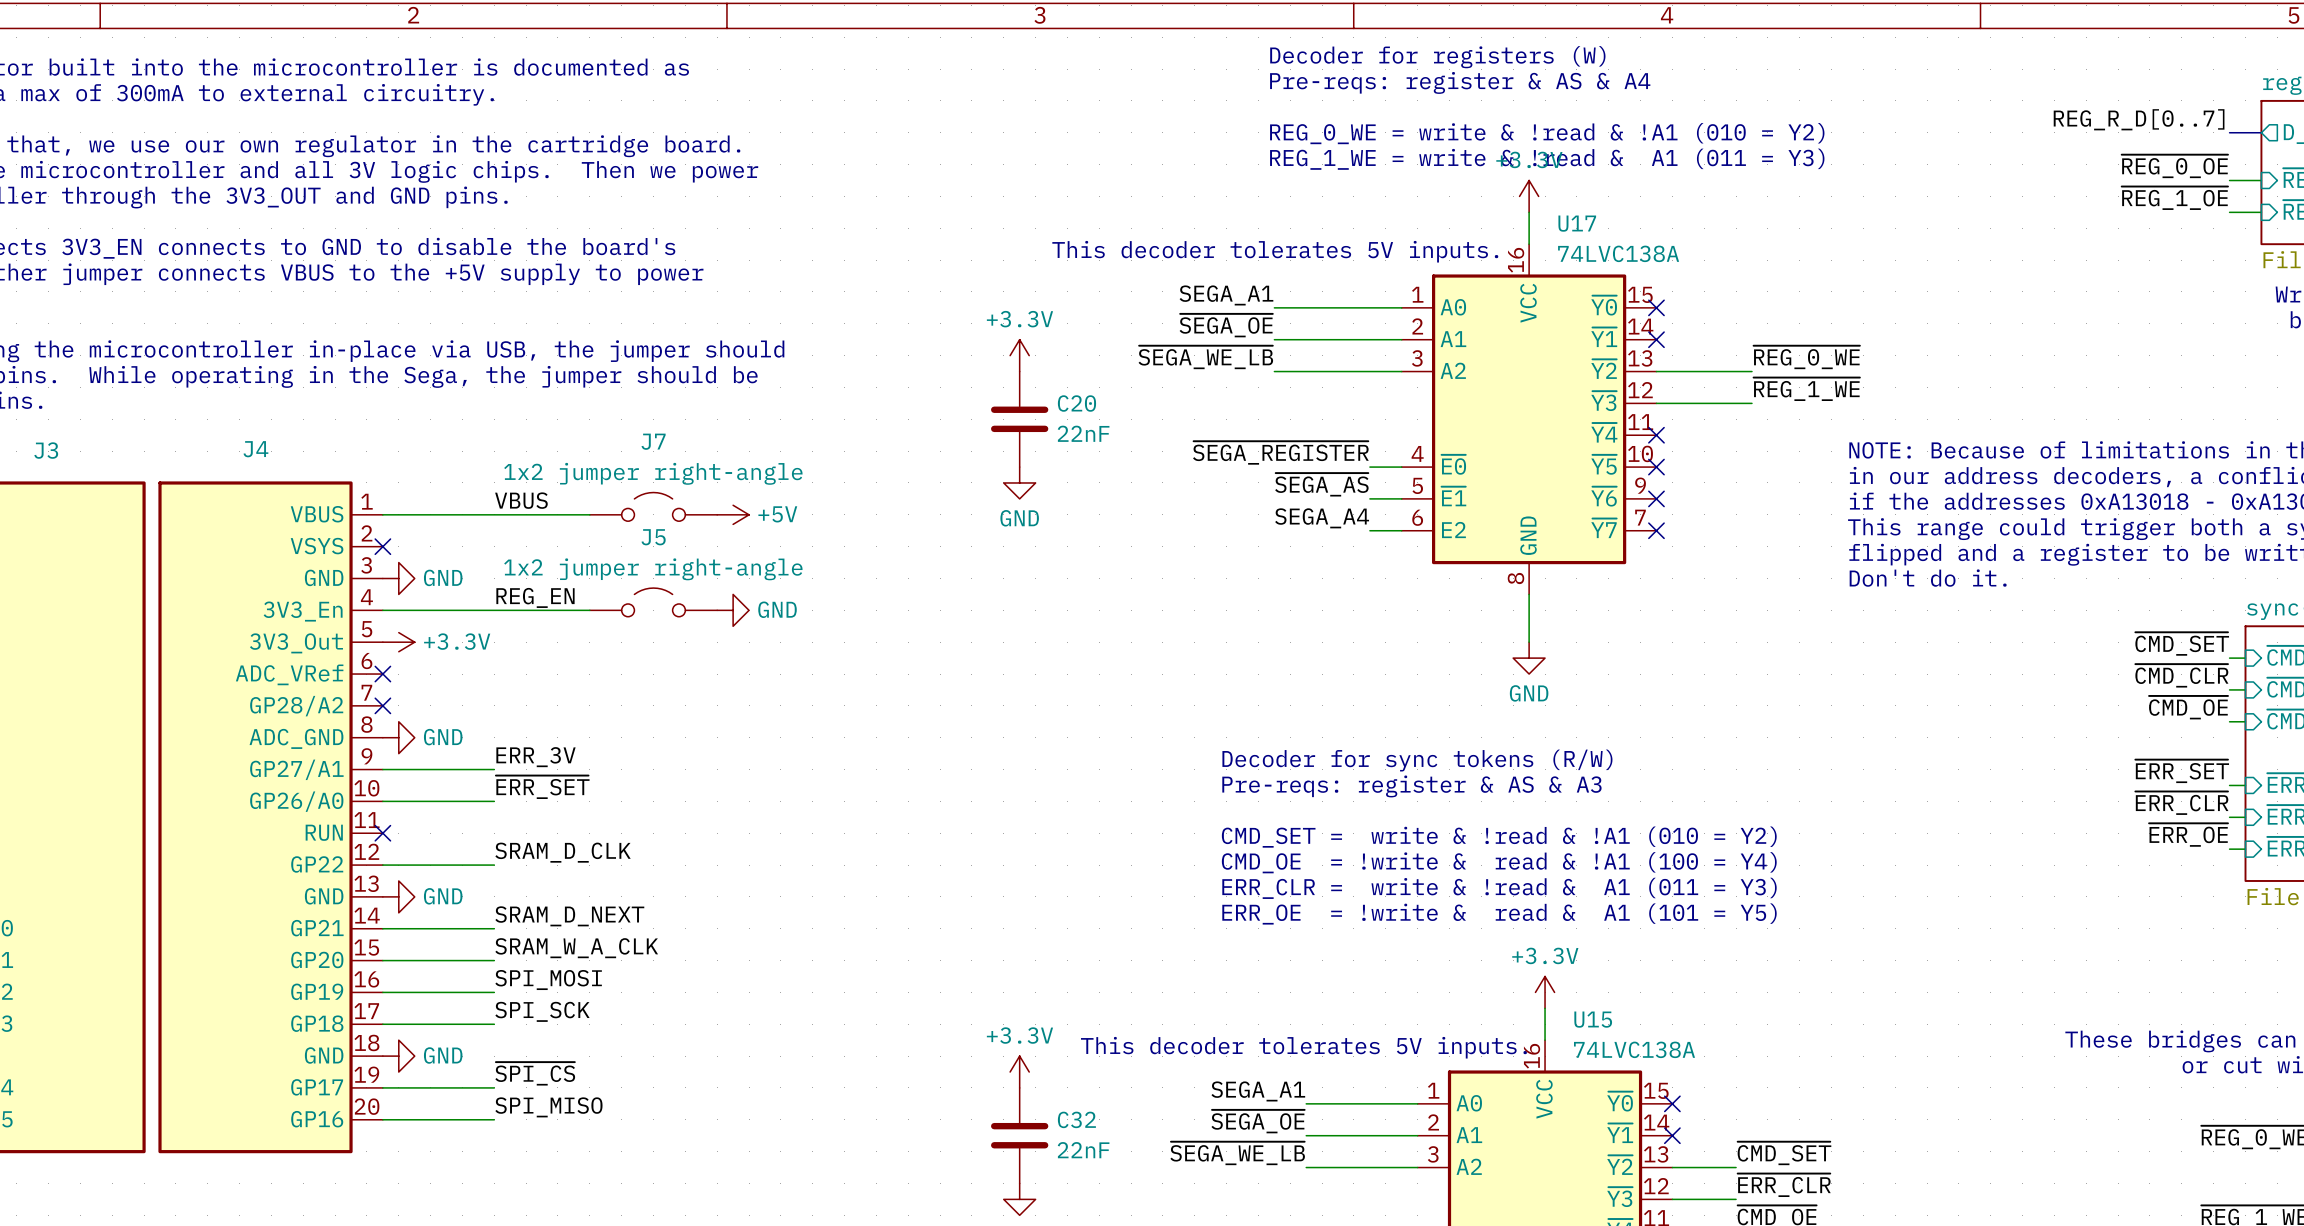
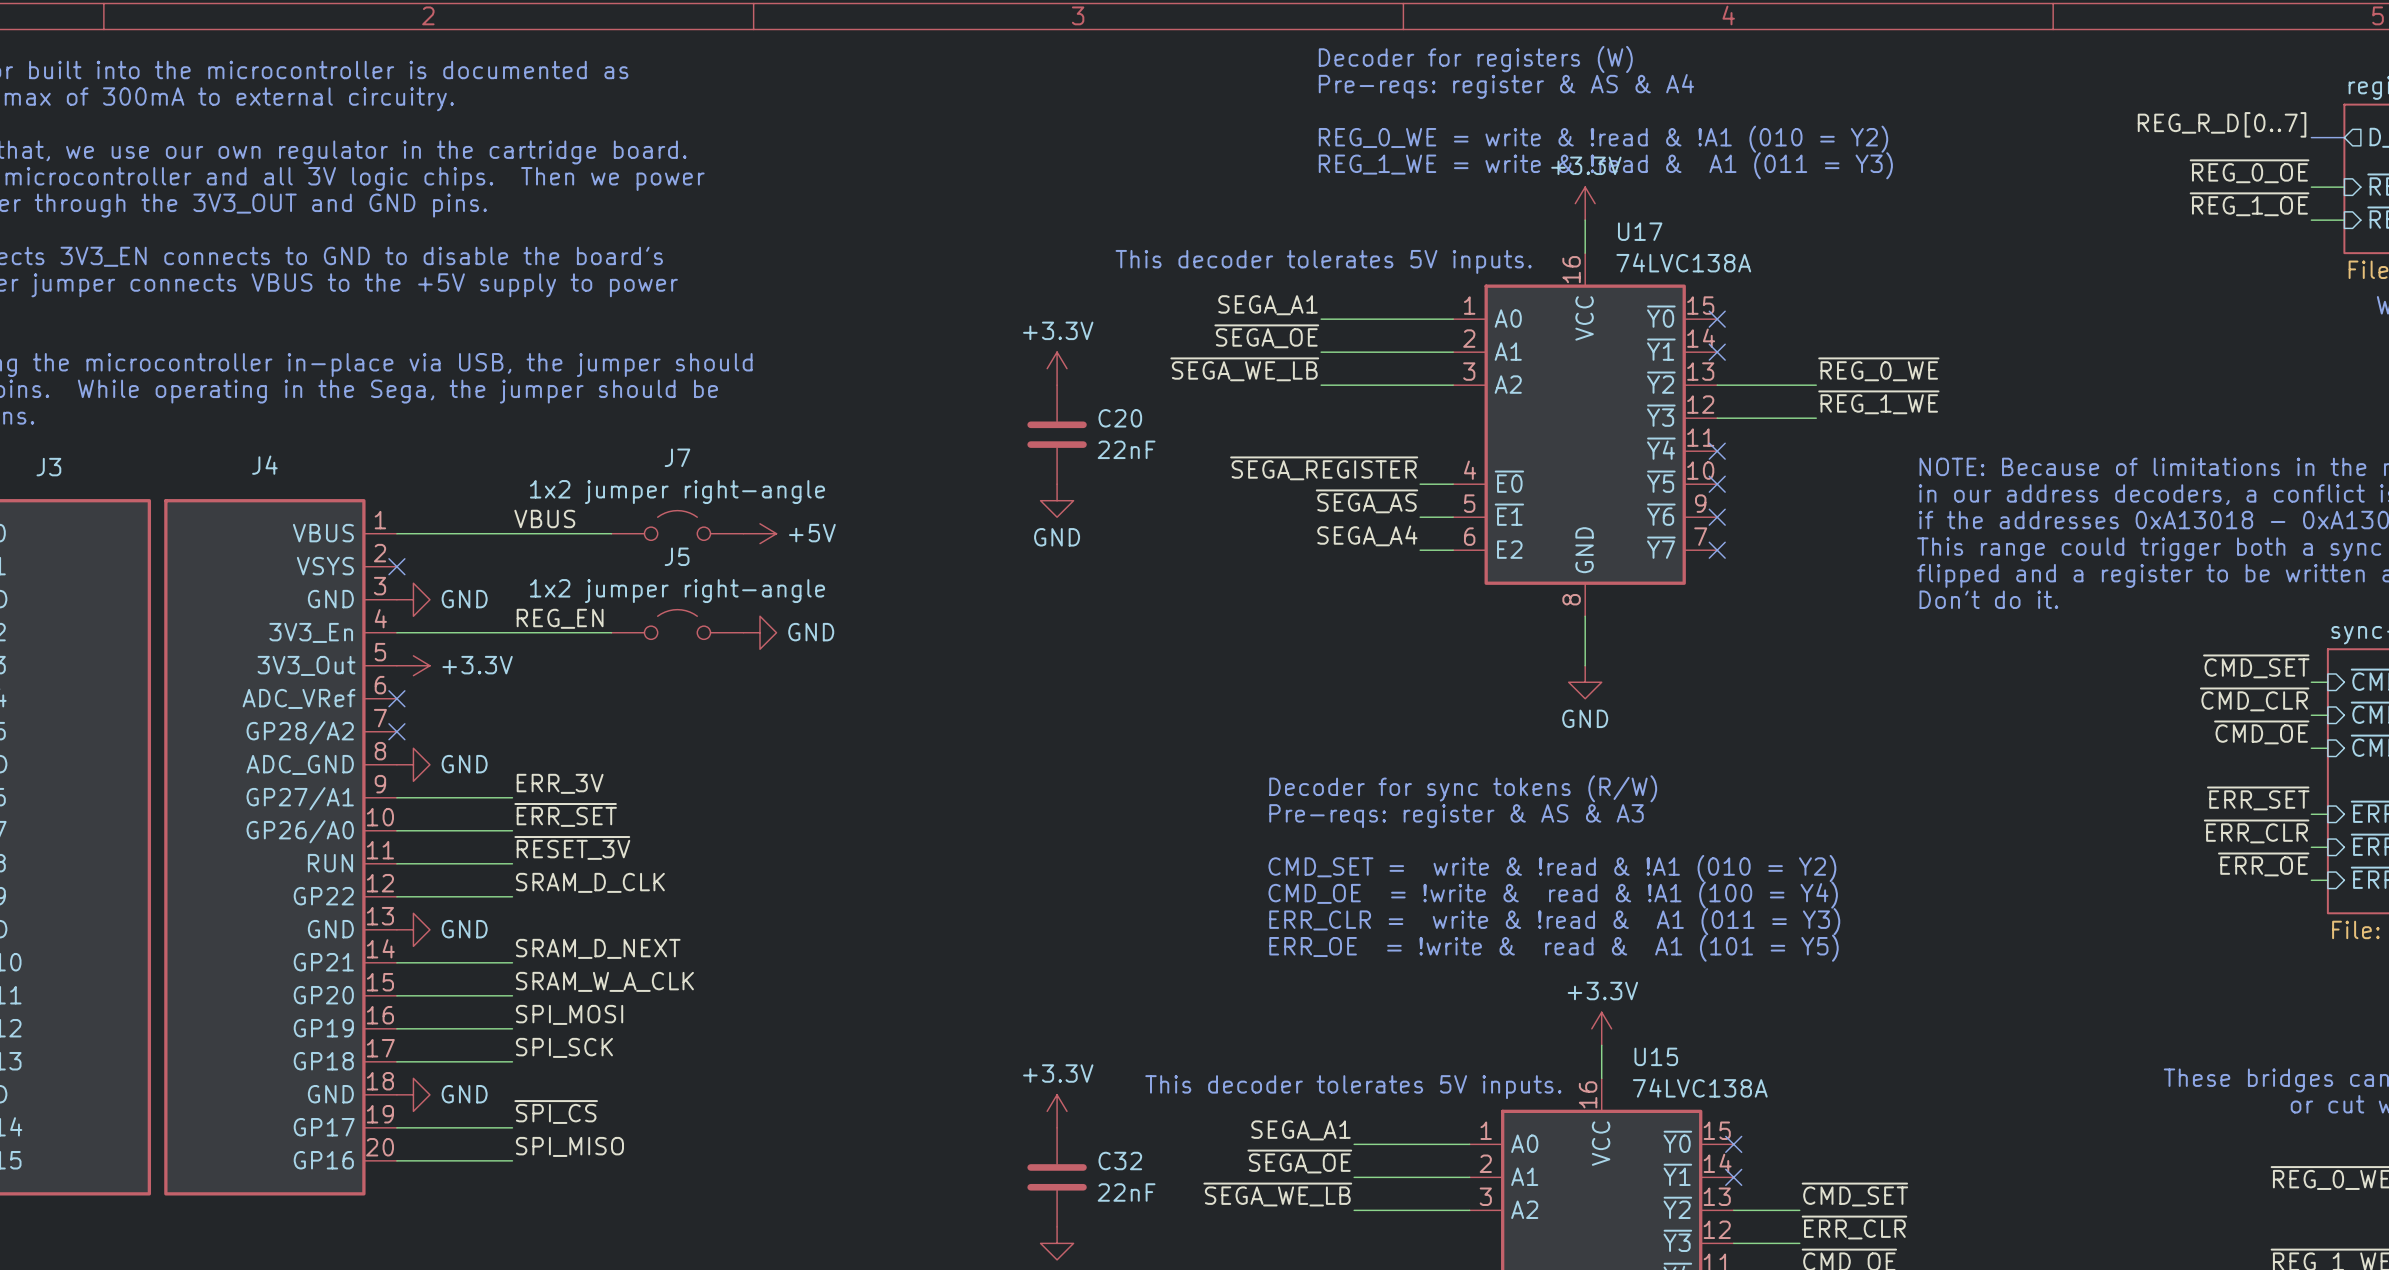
label: none -> ~{RESET_3V} (572, 847)
wire: none -> (396, 863) (512, 863)
no-connect mark: (382, 833) -> none

